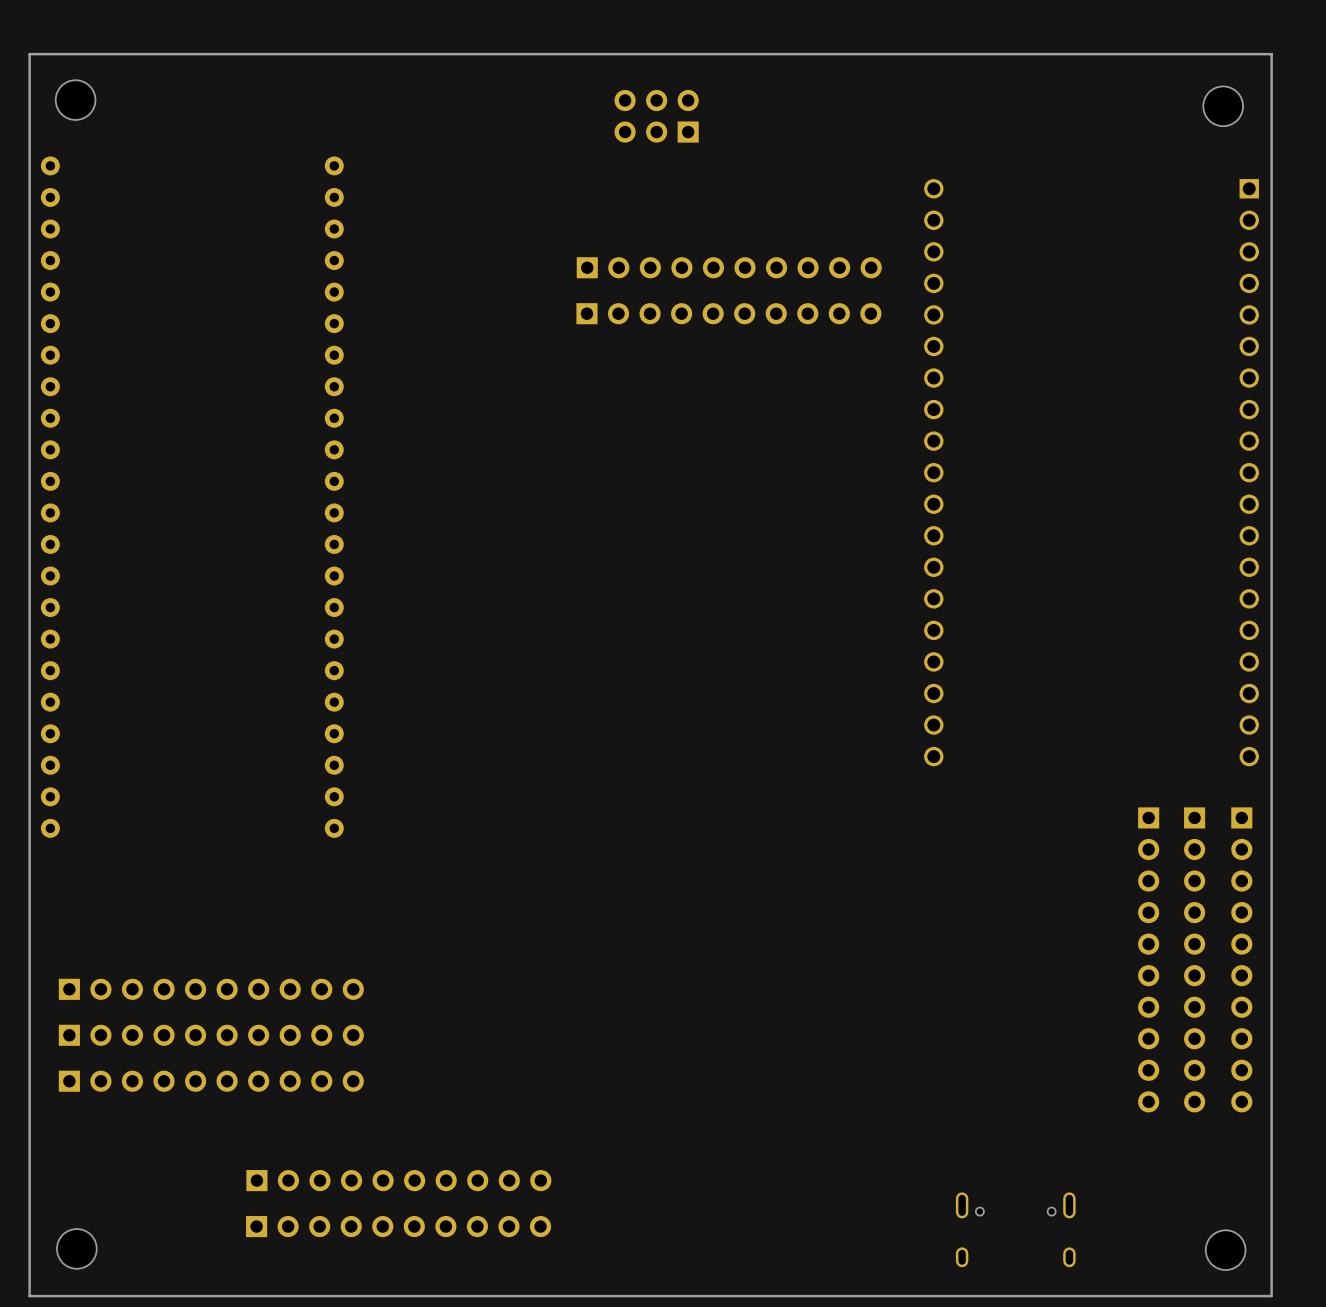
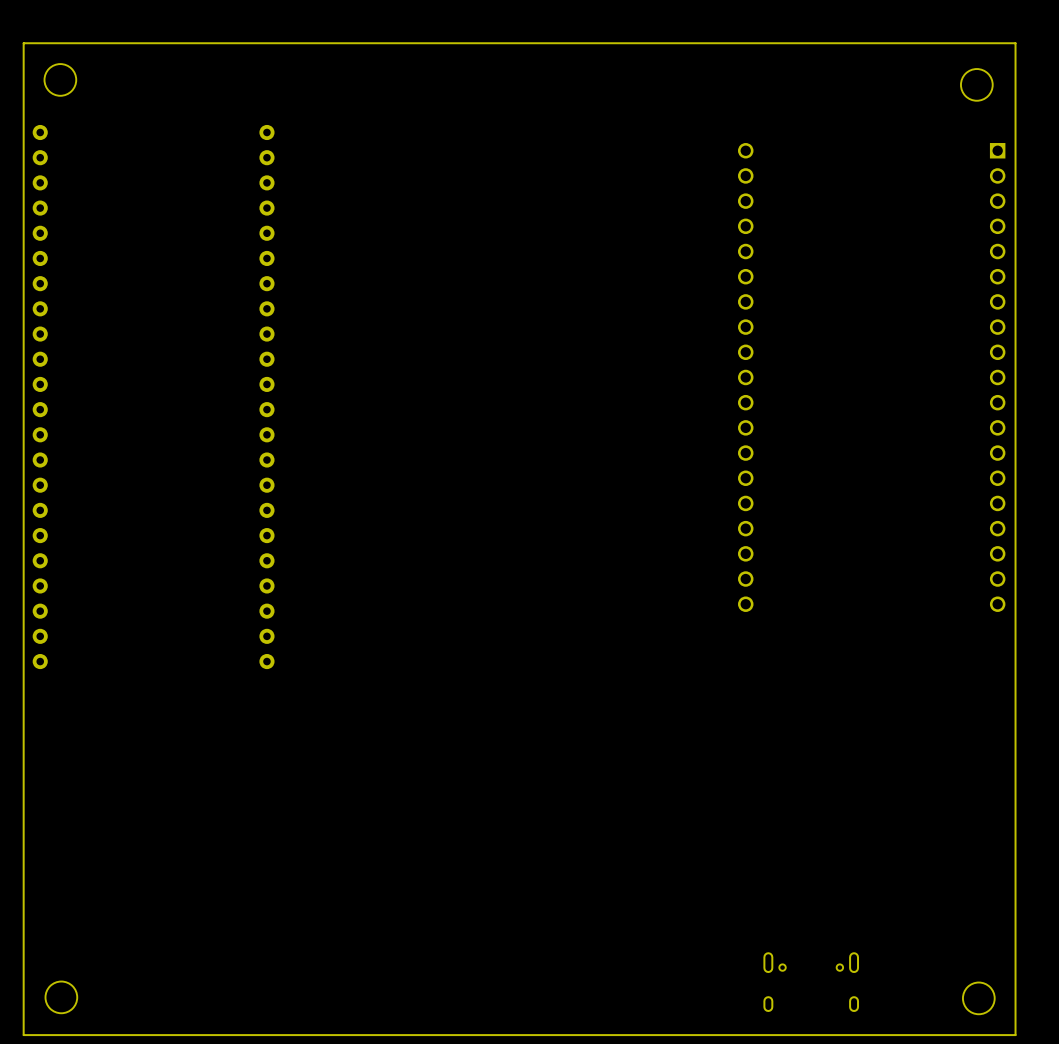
part: (656, 116) -> none
part: (729, 267) -> none
part: (728, 313) -> none
part: (1148, 959) -> none
part: (1194, 959) -> none
part: (1241, 959) -> none
part: (211, 989) -> none
part: (211, 1035) -> none
part: (211, 1081) -> none
part: (398, 1180) -> none
part: (398, 1226) -> none

